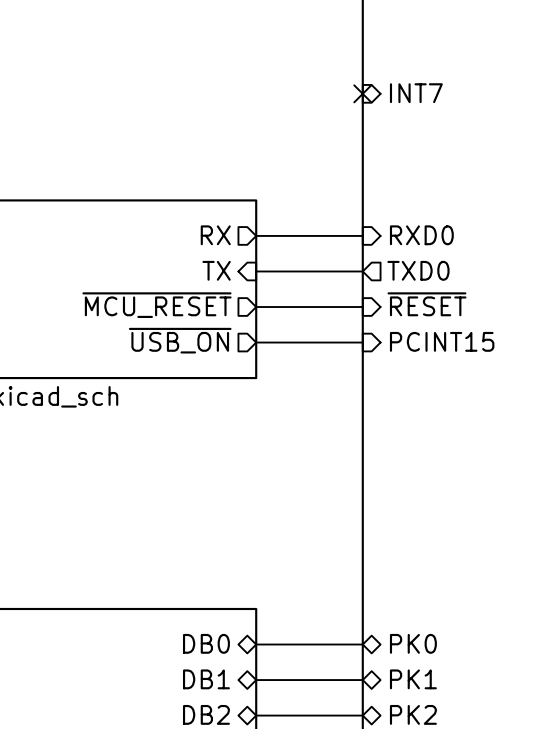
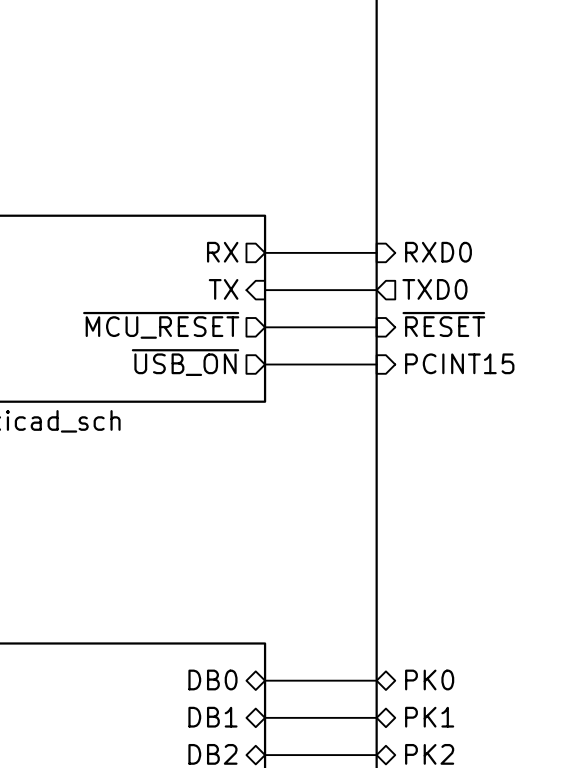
no-connect mark: (362, 93) -> none
sheet pin: INT7 (416, 93) -> none

